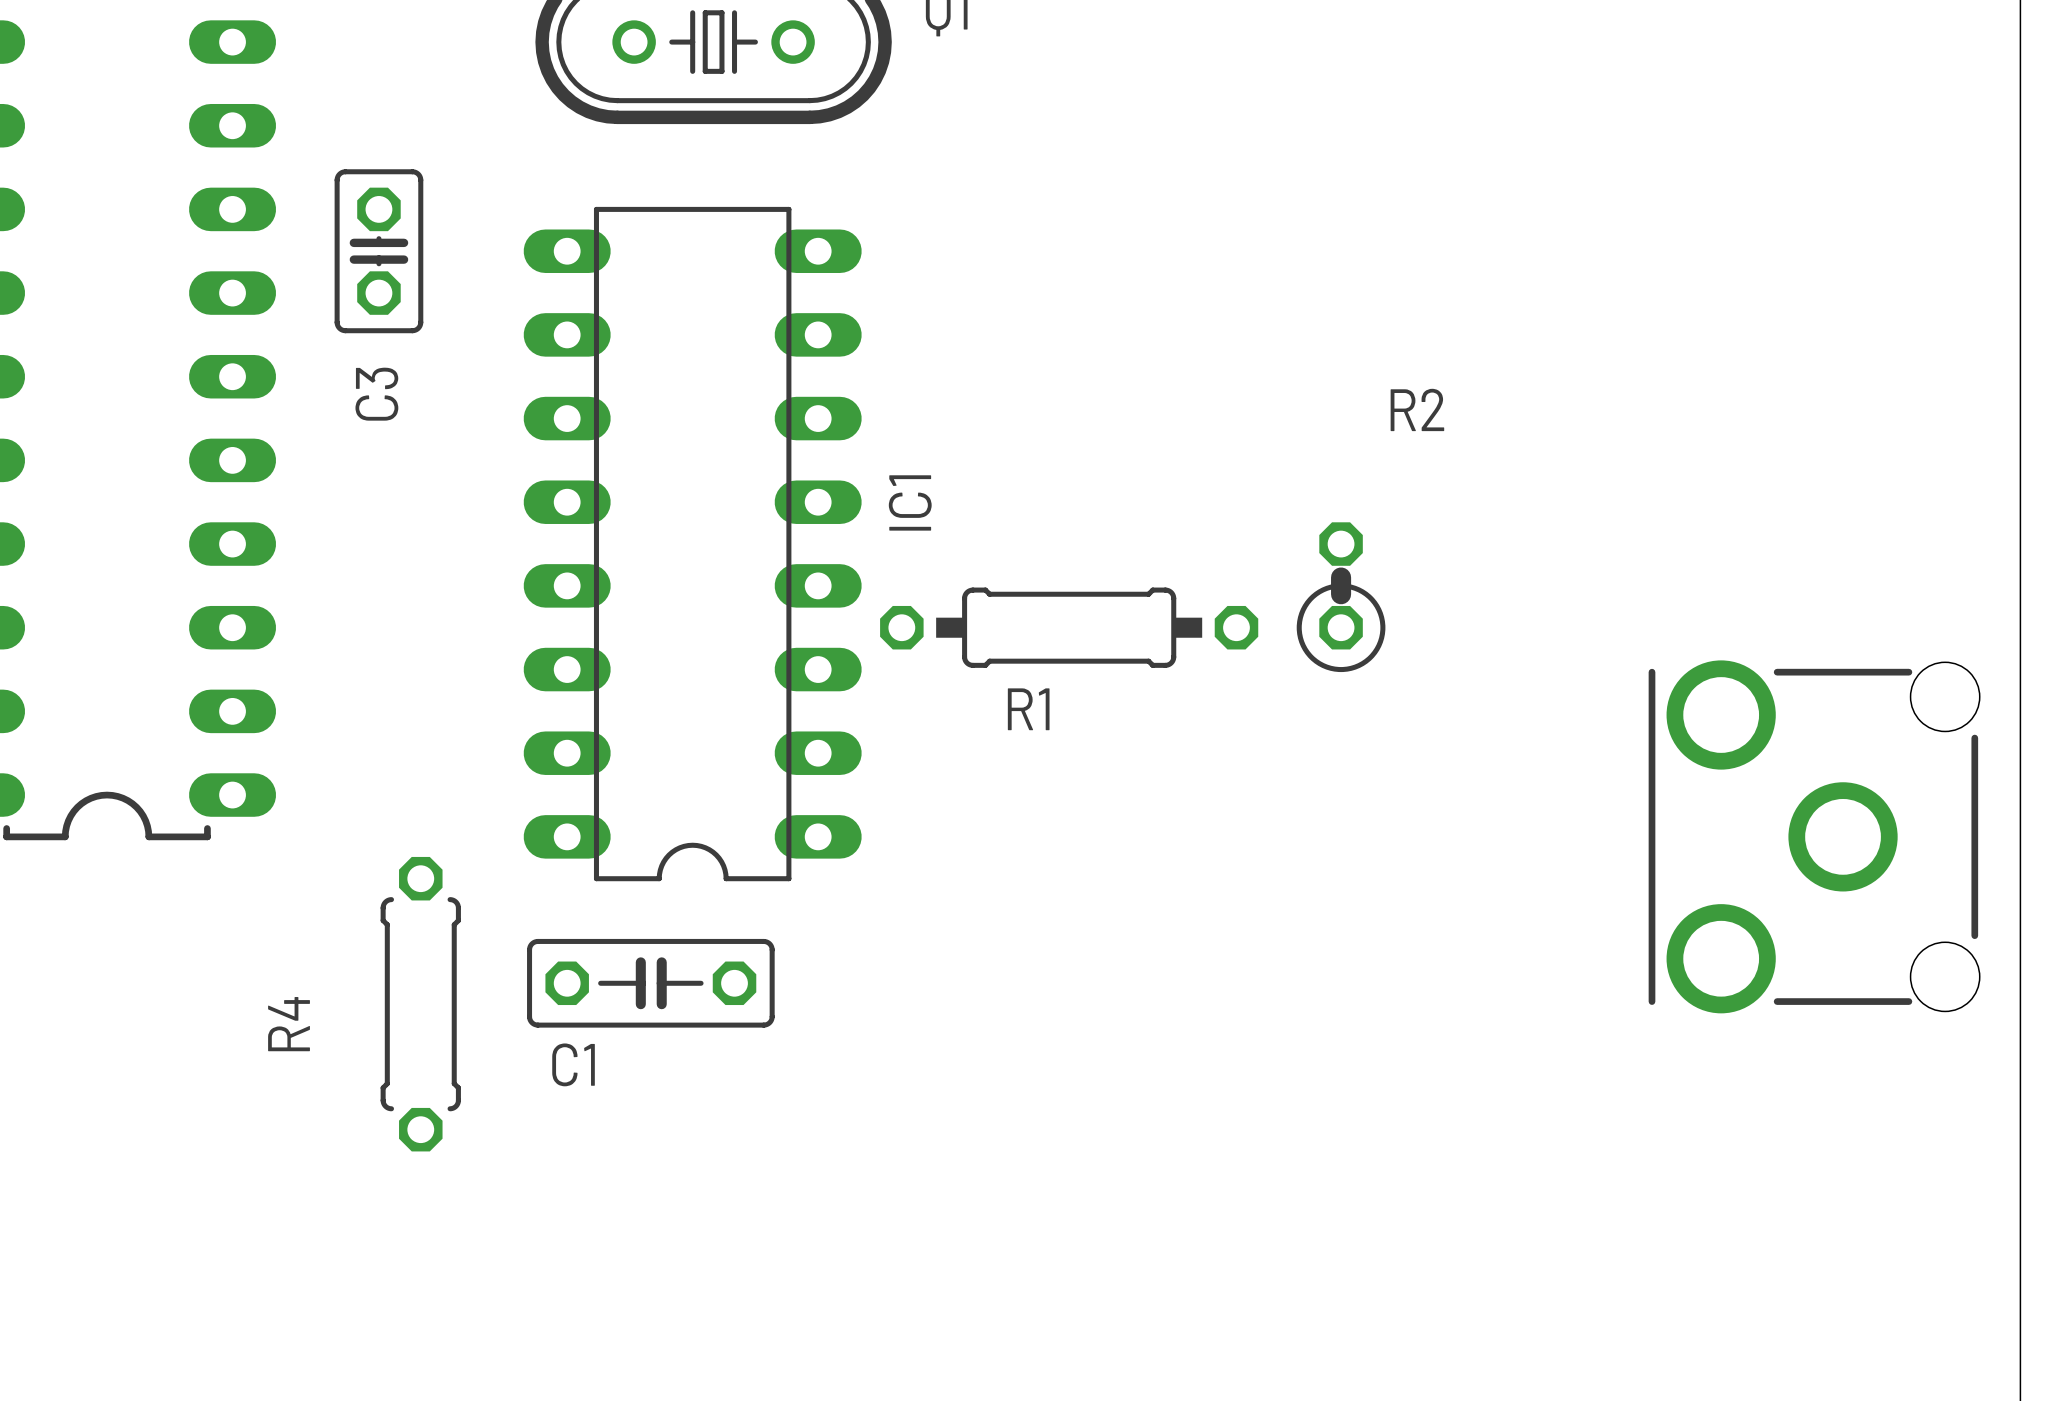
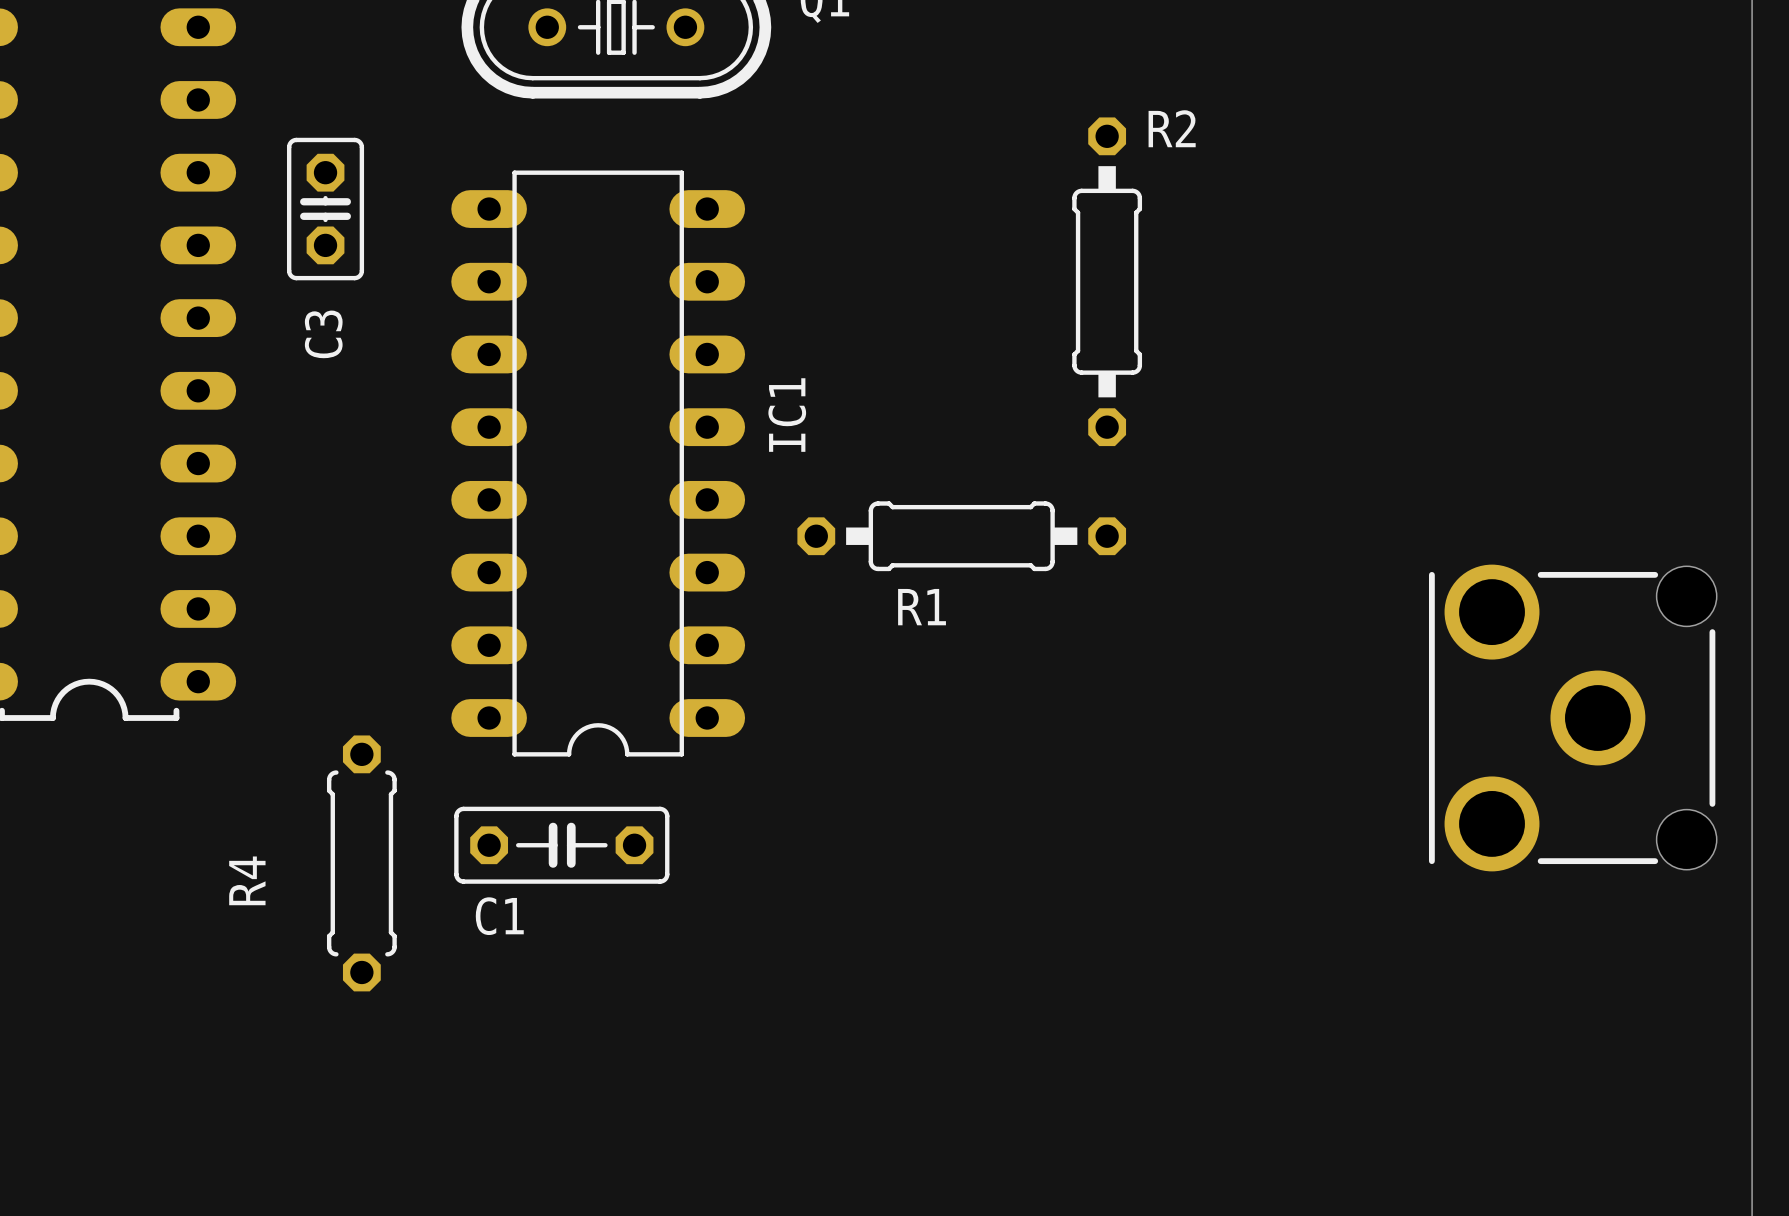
R2 footprint: [1296, 522, 1386, 673] -> [1072, 117, 1143, 447]
R1 position: (1069, 627) -> (961, 536)

